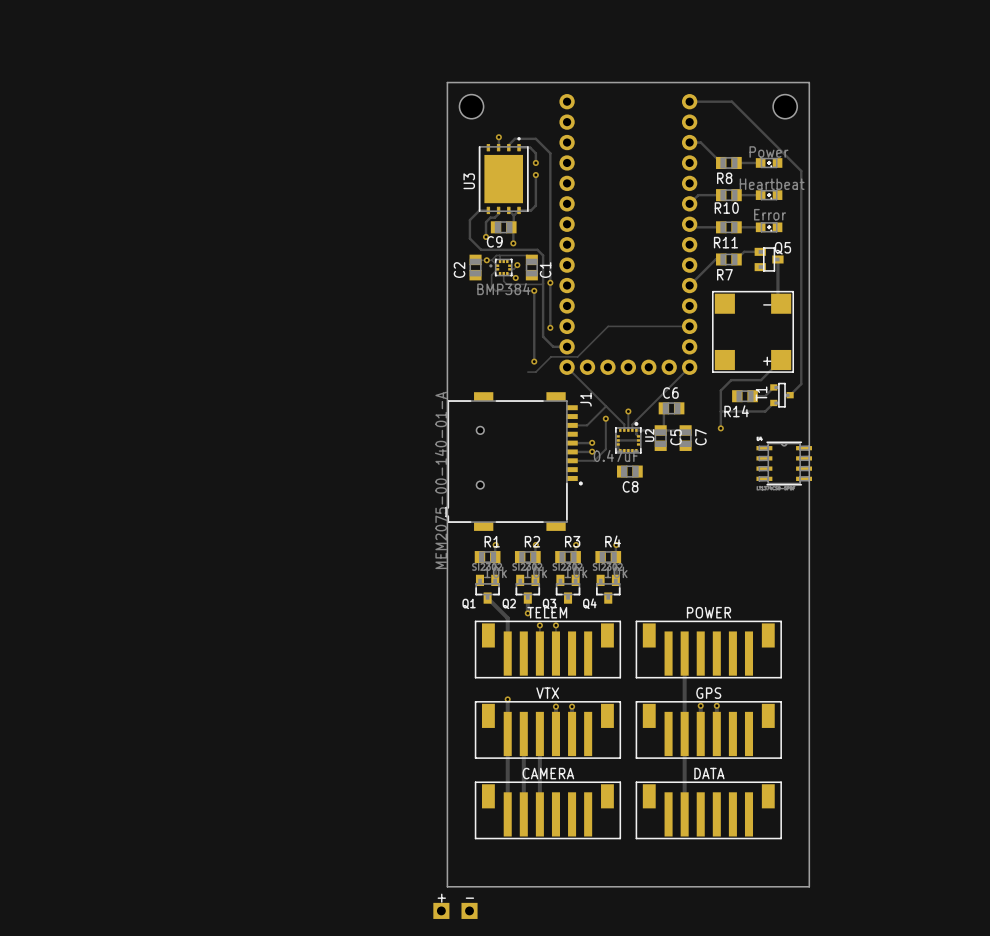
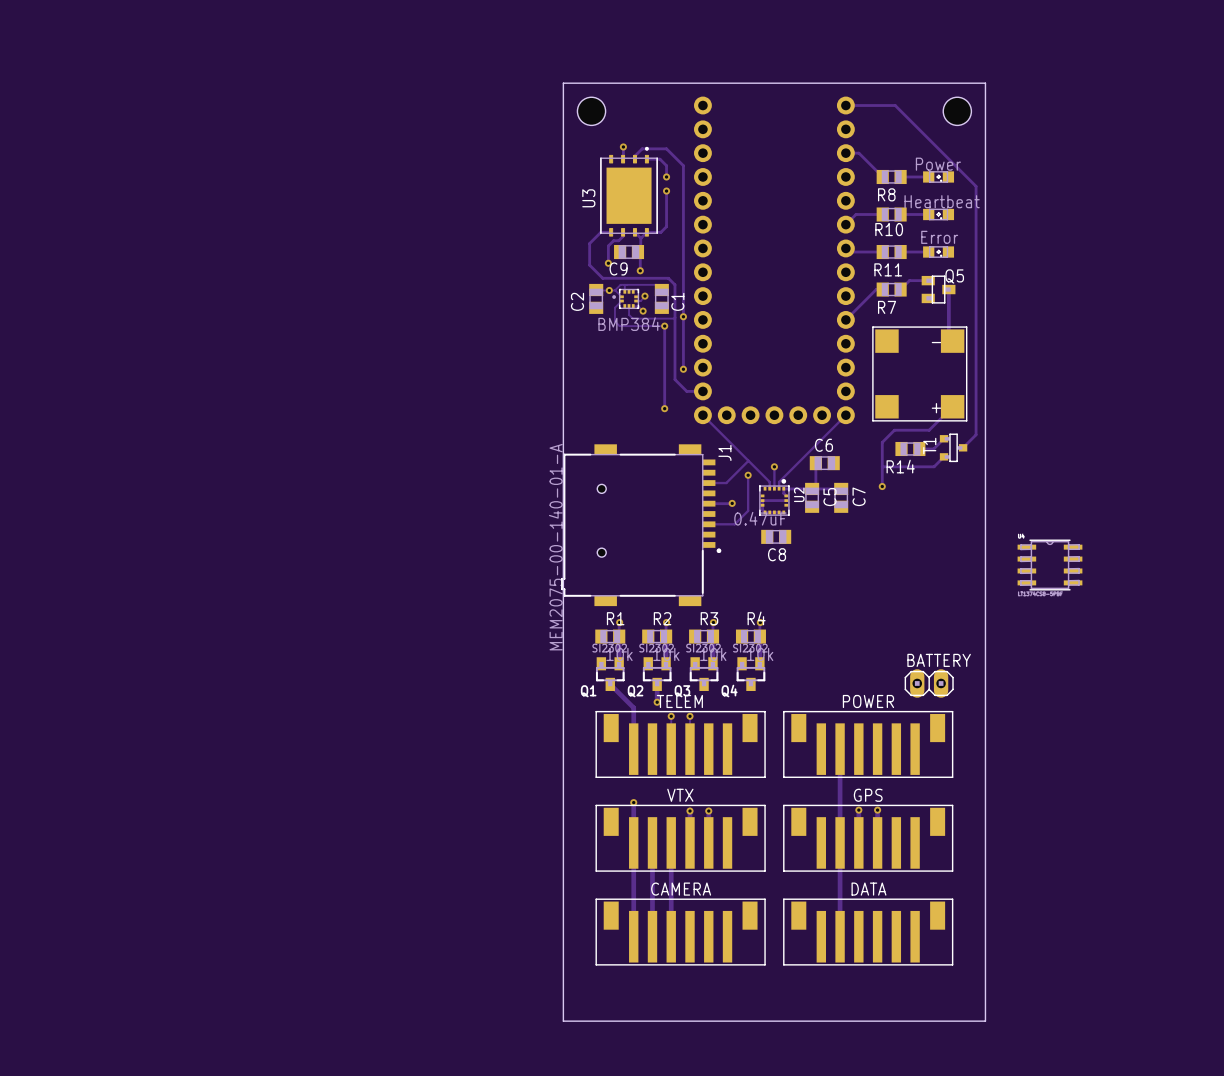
track: (689, 326) (608, 326) (577, 356) (551, 356) (535, 372) (527, 372) -> none
track: (592, 451) (572, 451) -> none
via: (592, 451) -> none
part position: (784, 463) -> (1049, 565)
BATTERY: none -> (929, 683)
part: (455, 910) -> none

